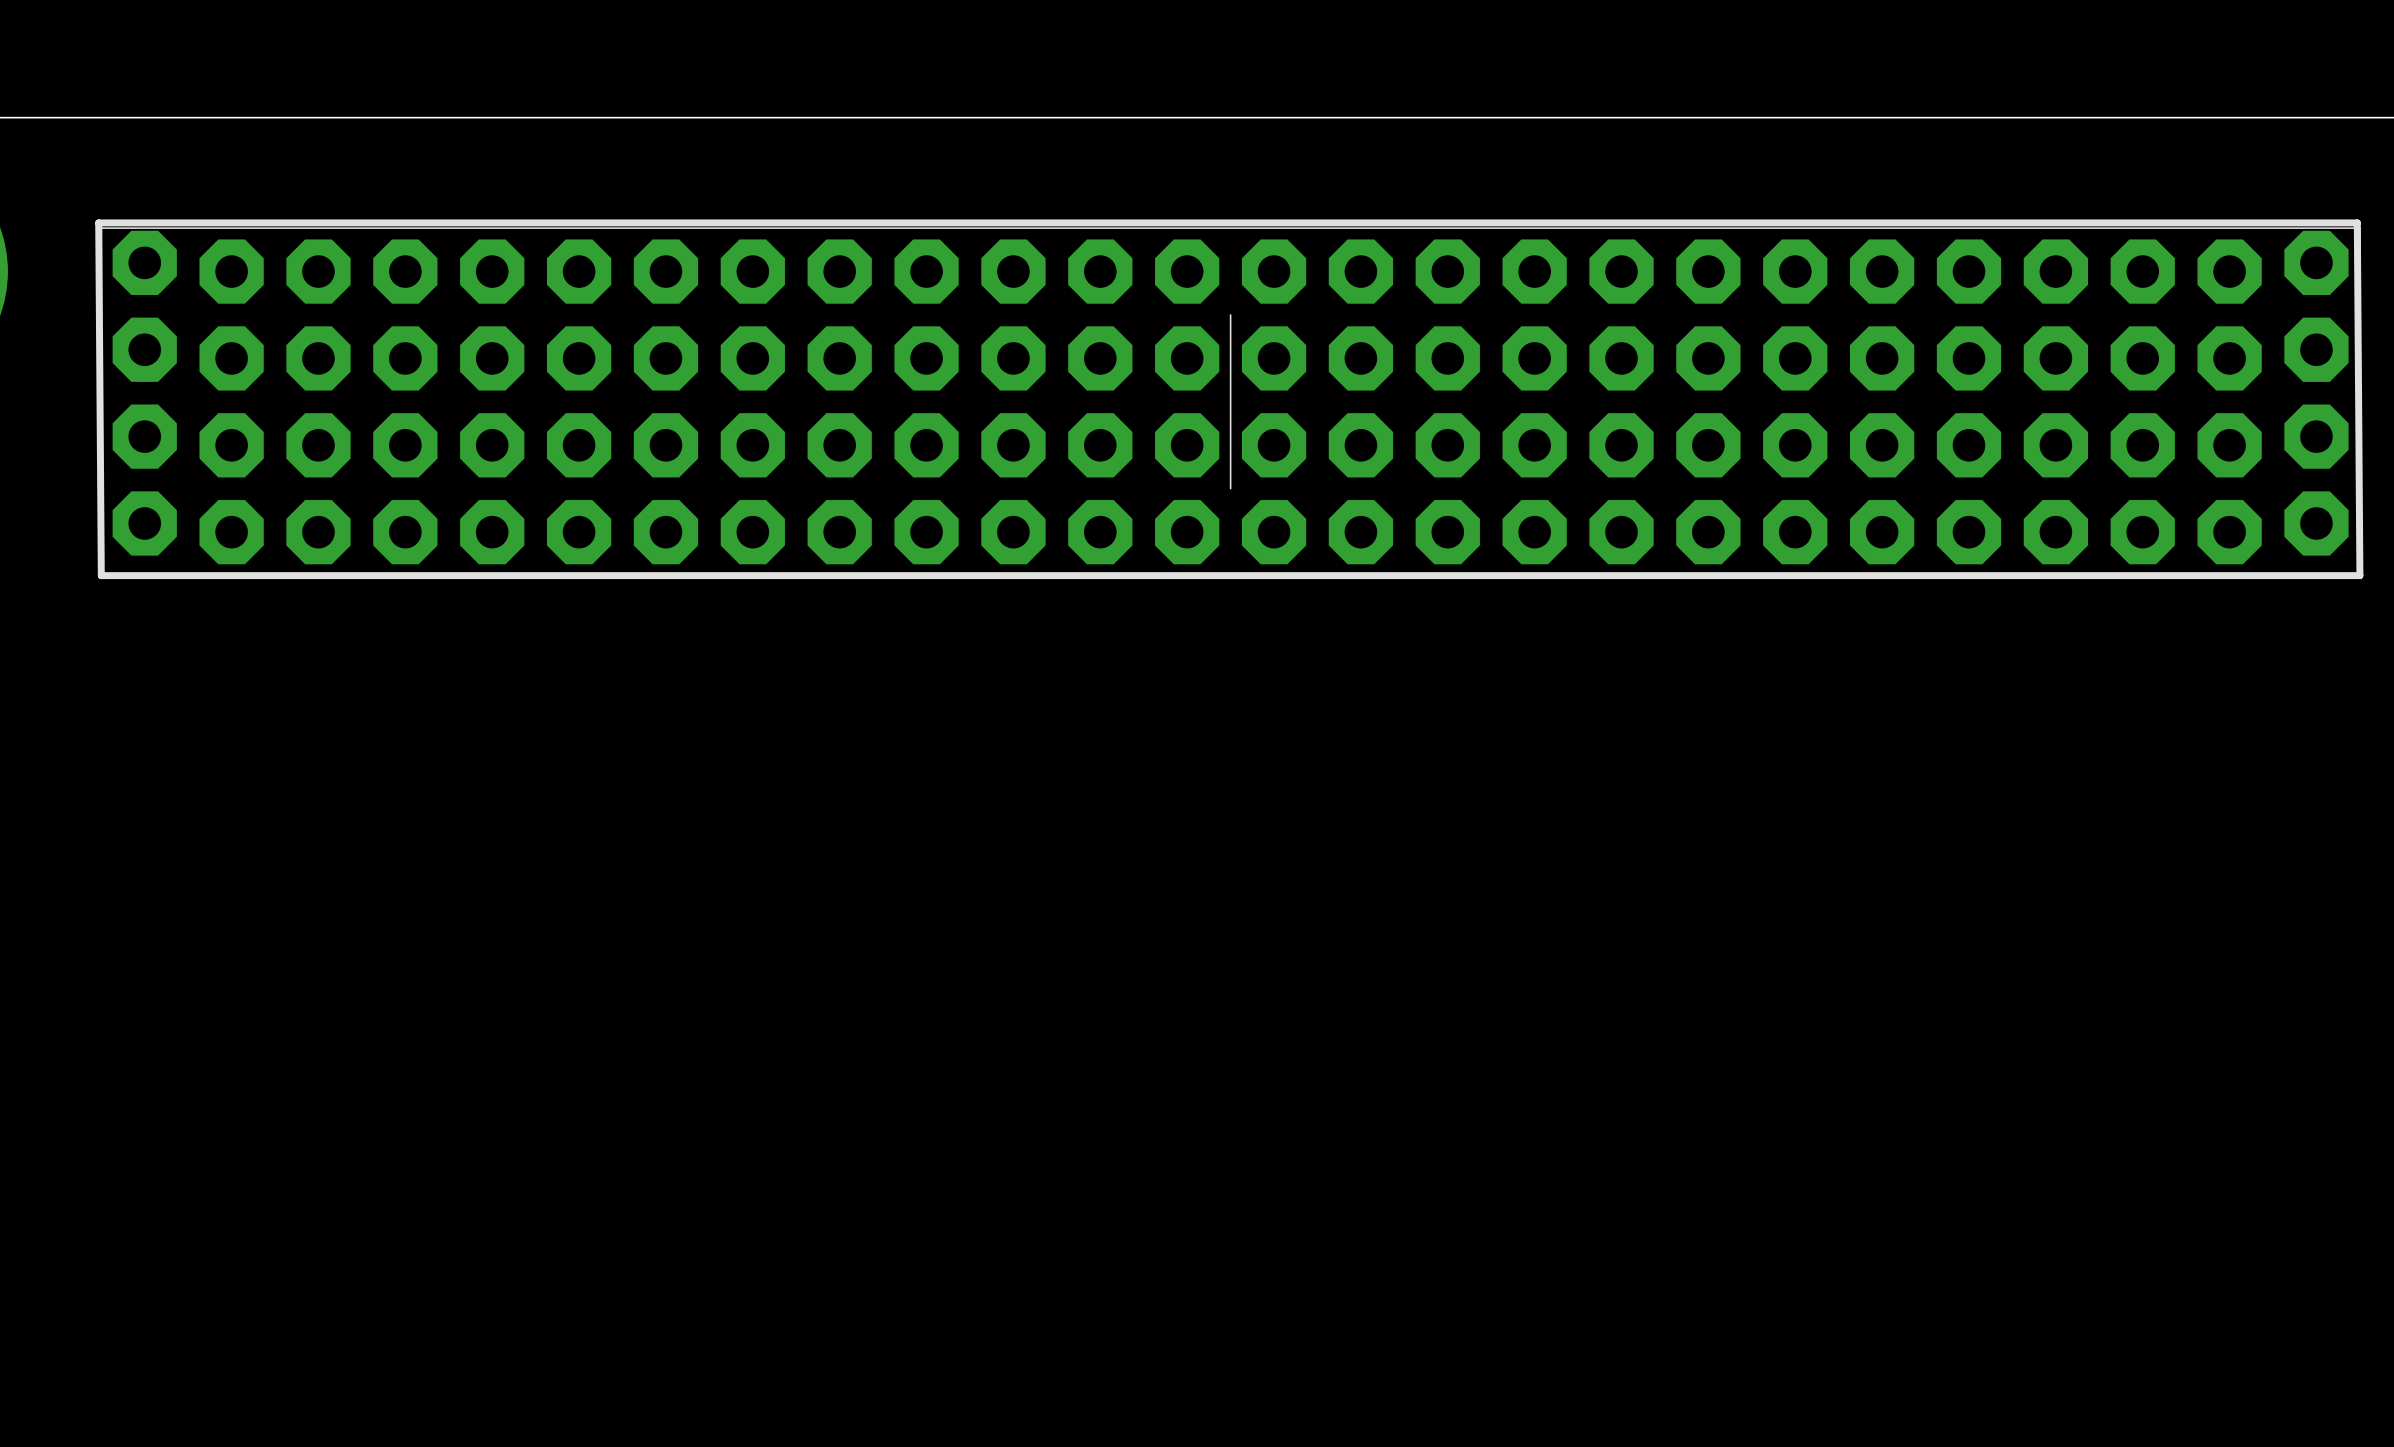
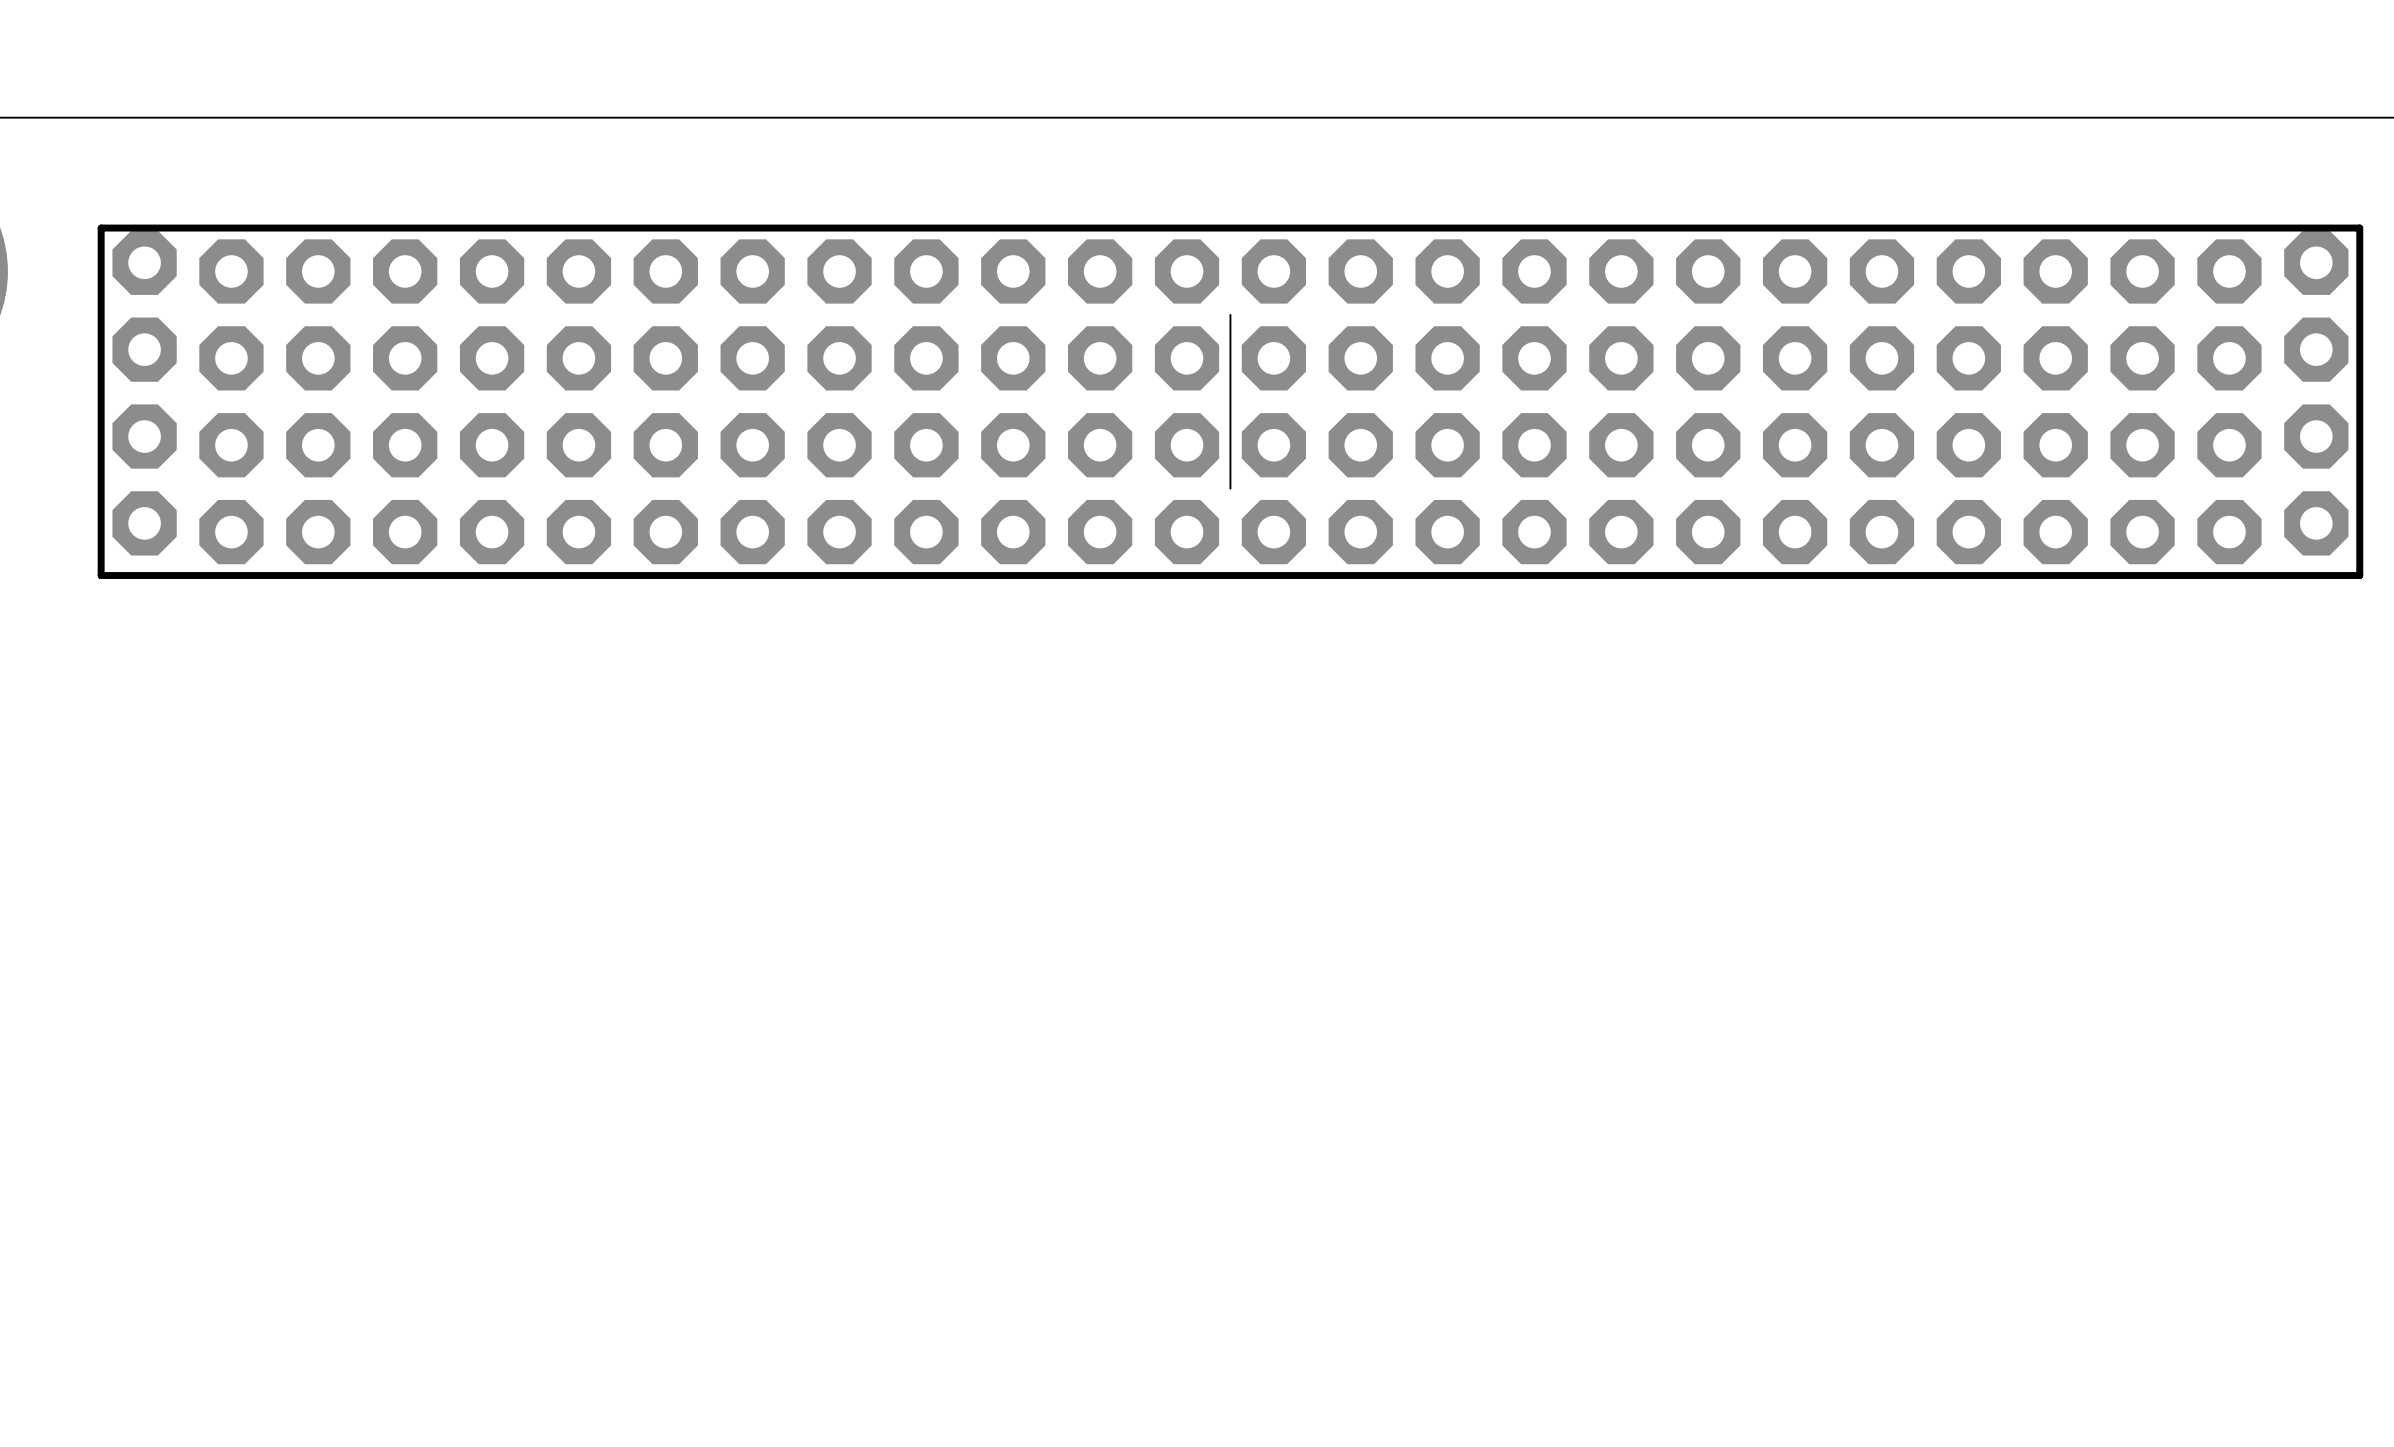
part footprint: [95, 219, 2364, 580] -> [97, 224, 2364, 580]

